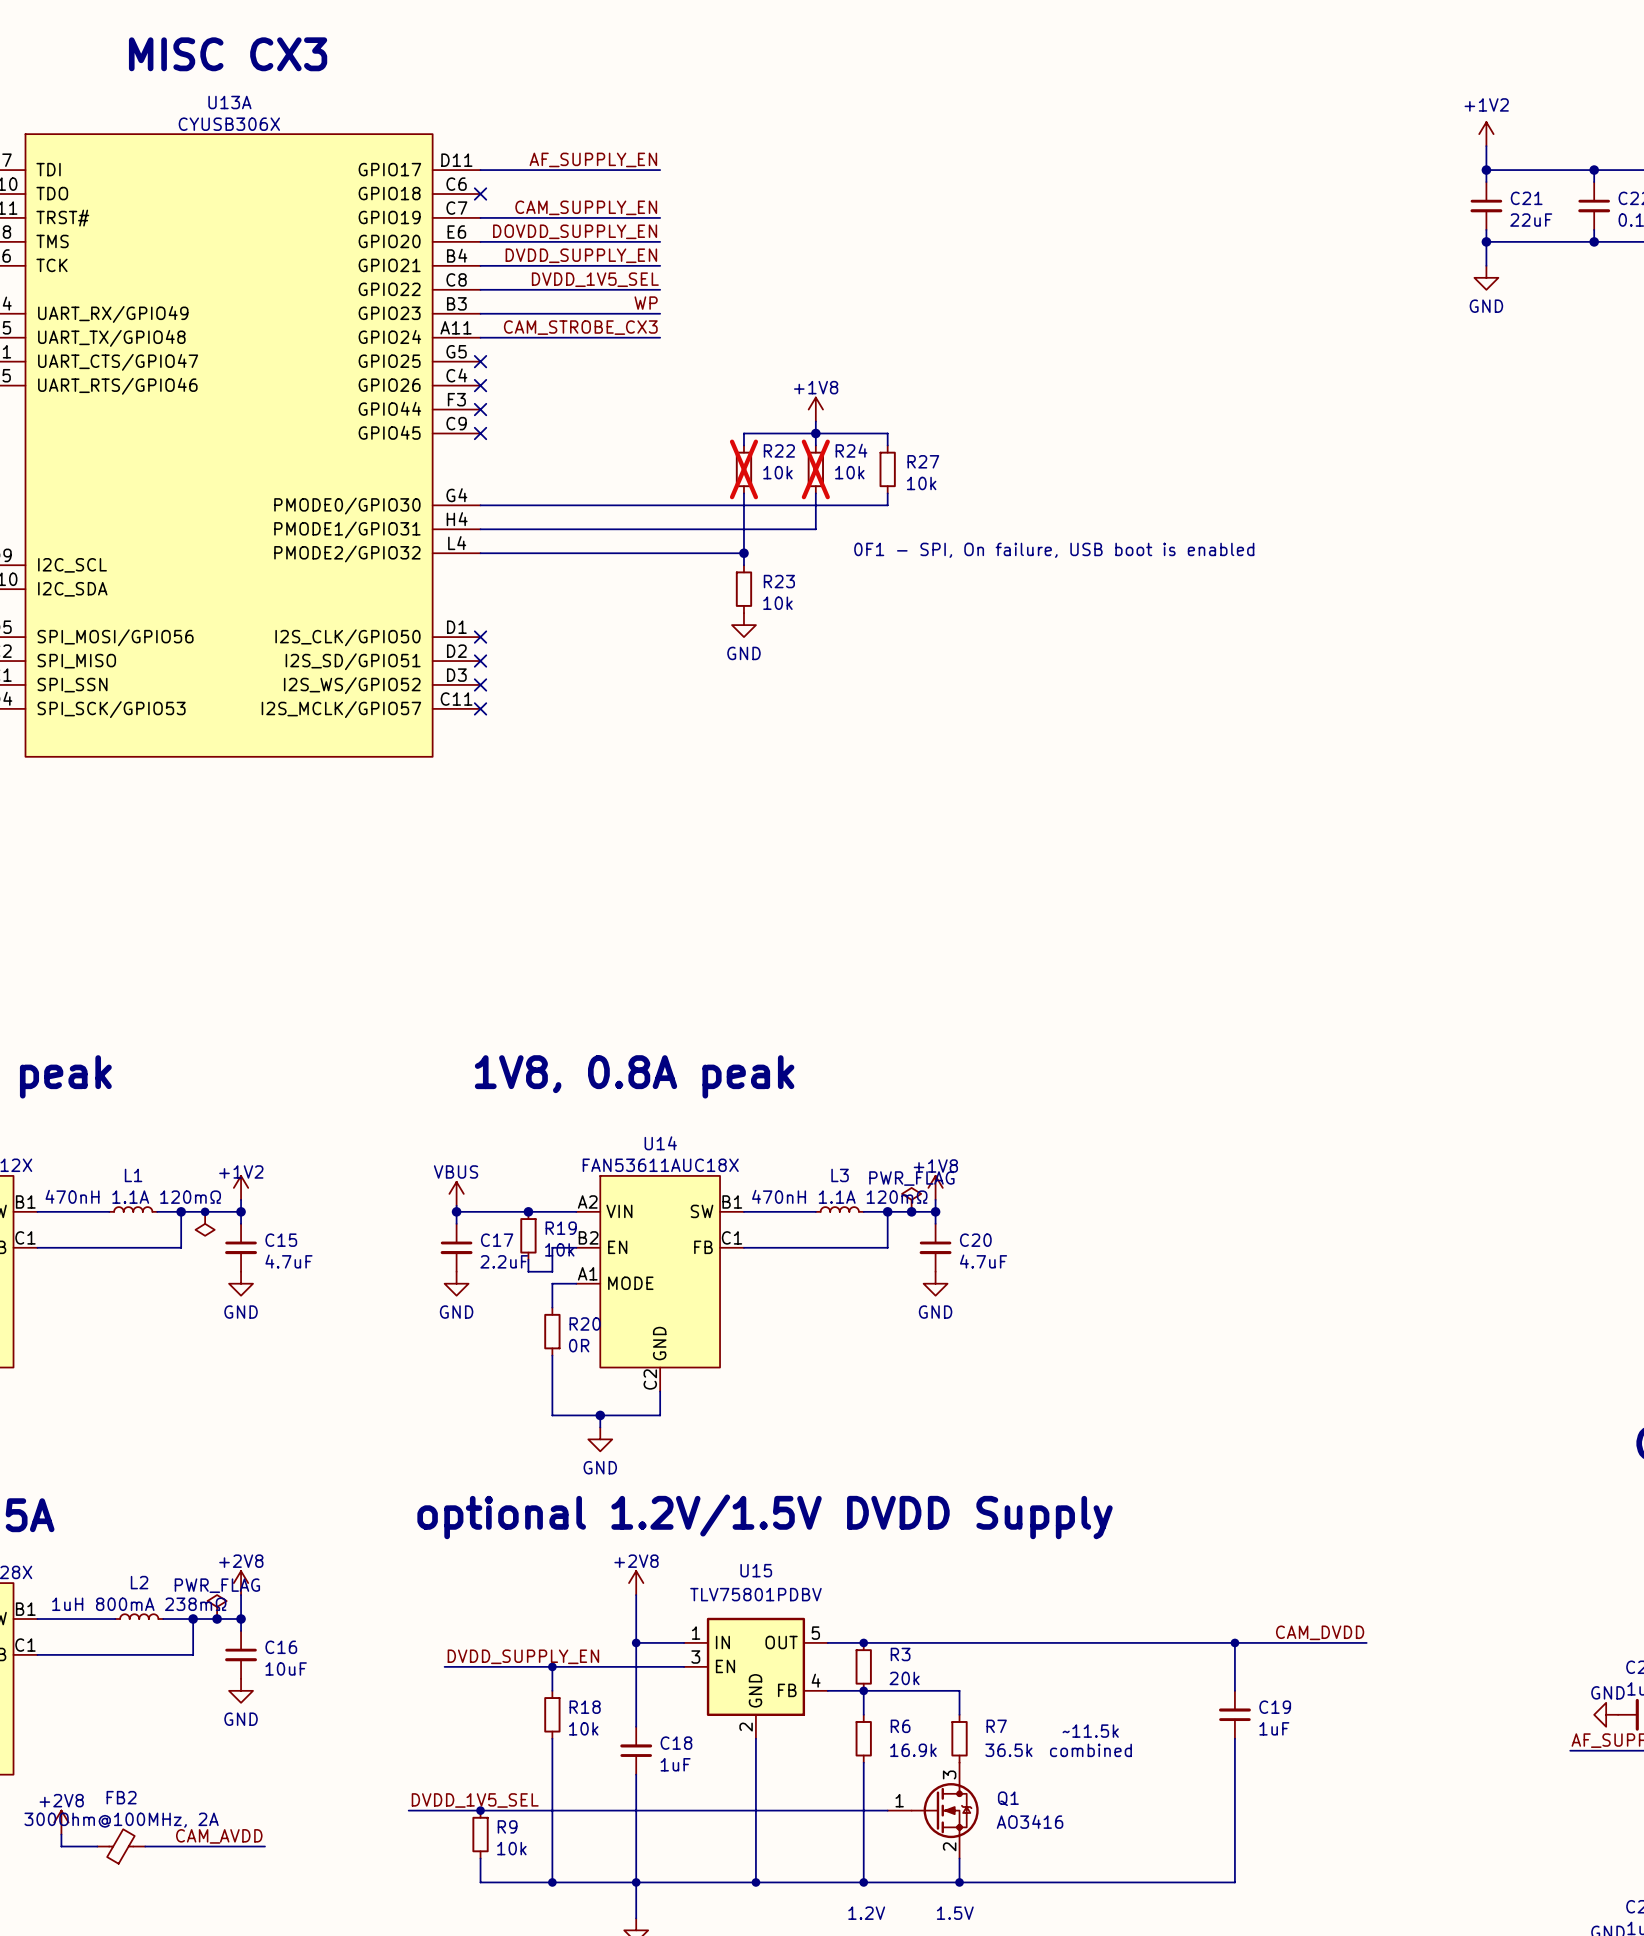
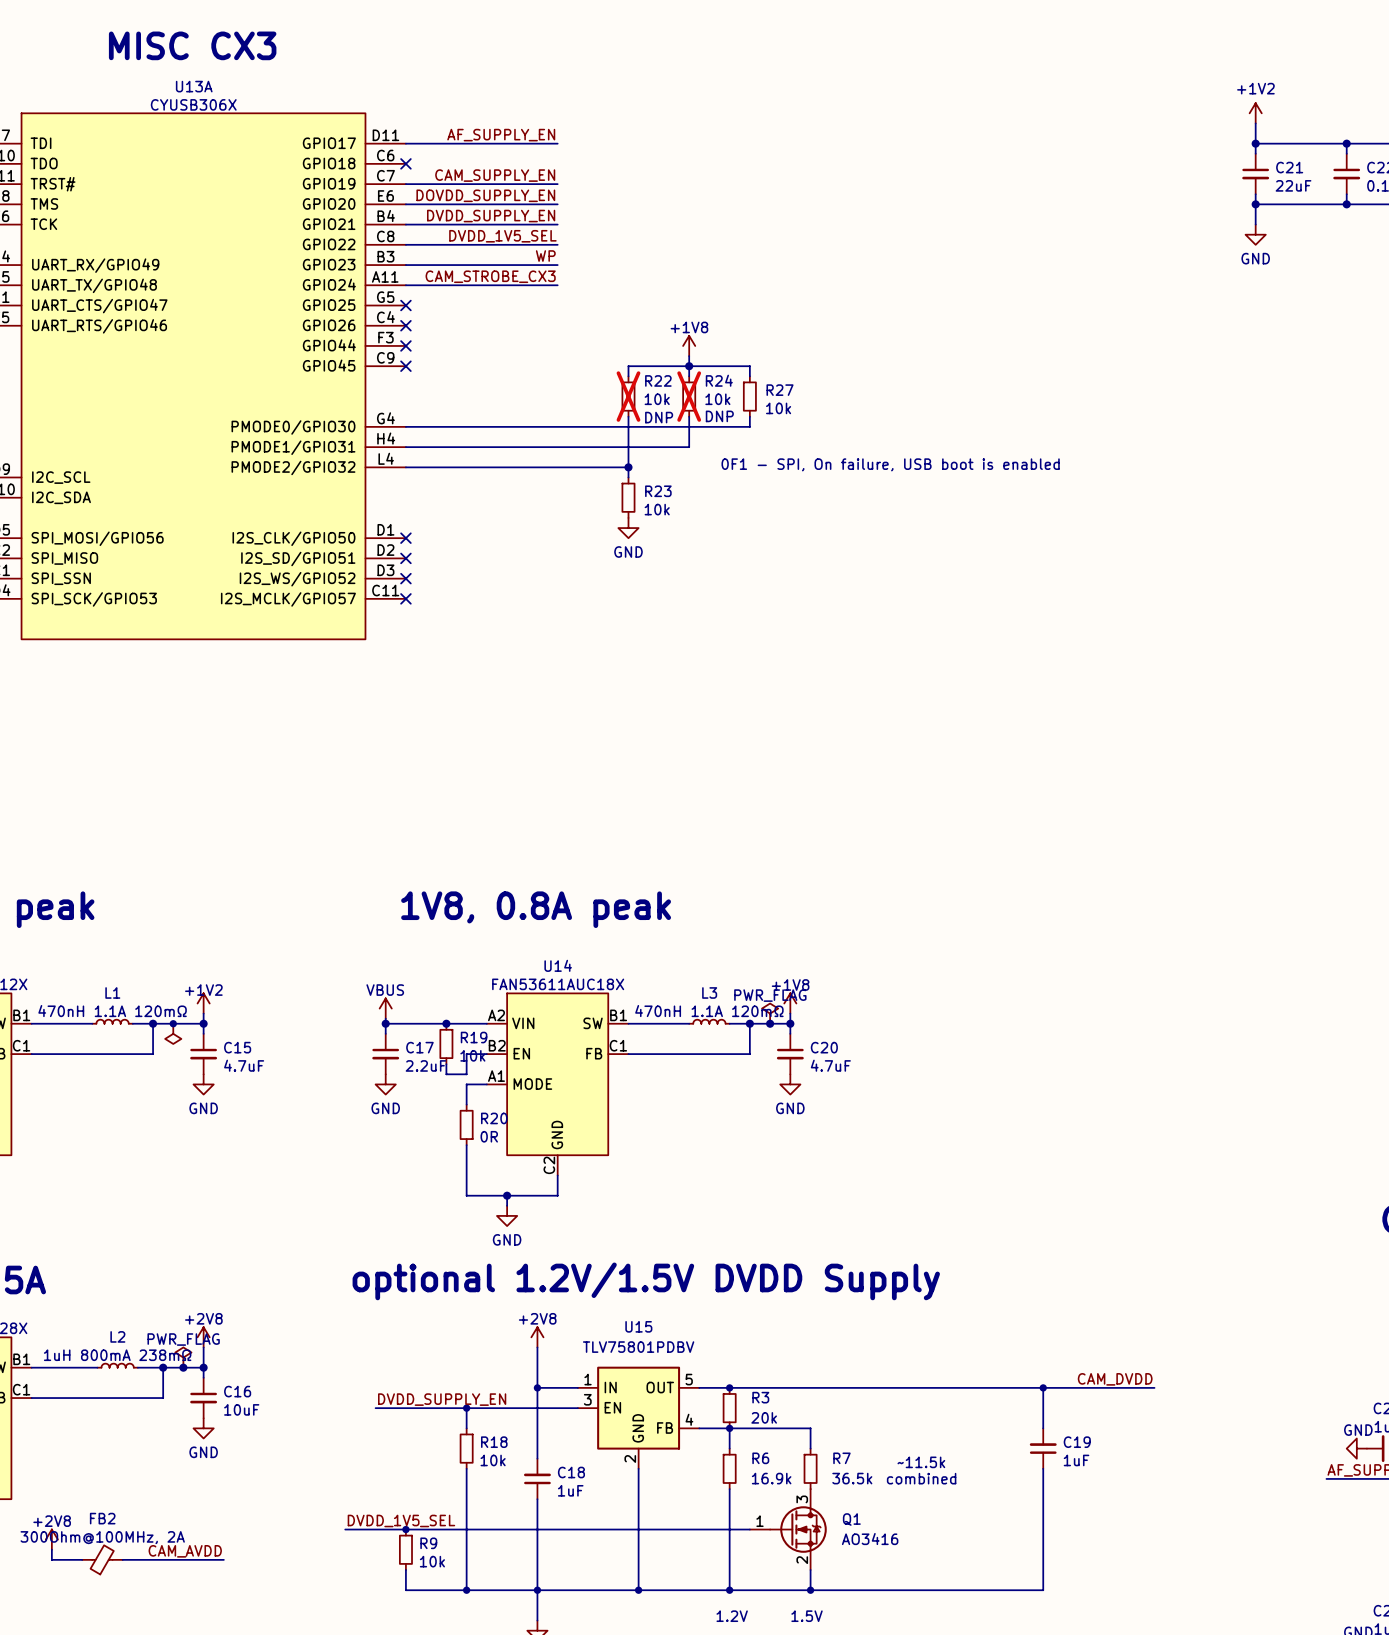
R24 text: none -> DNP (719, 416)
R22 text: none -> DNP (659, 417)

